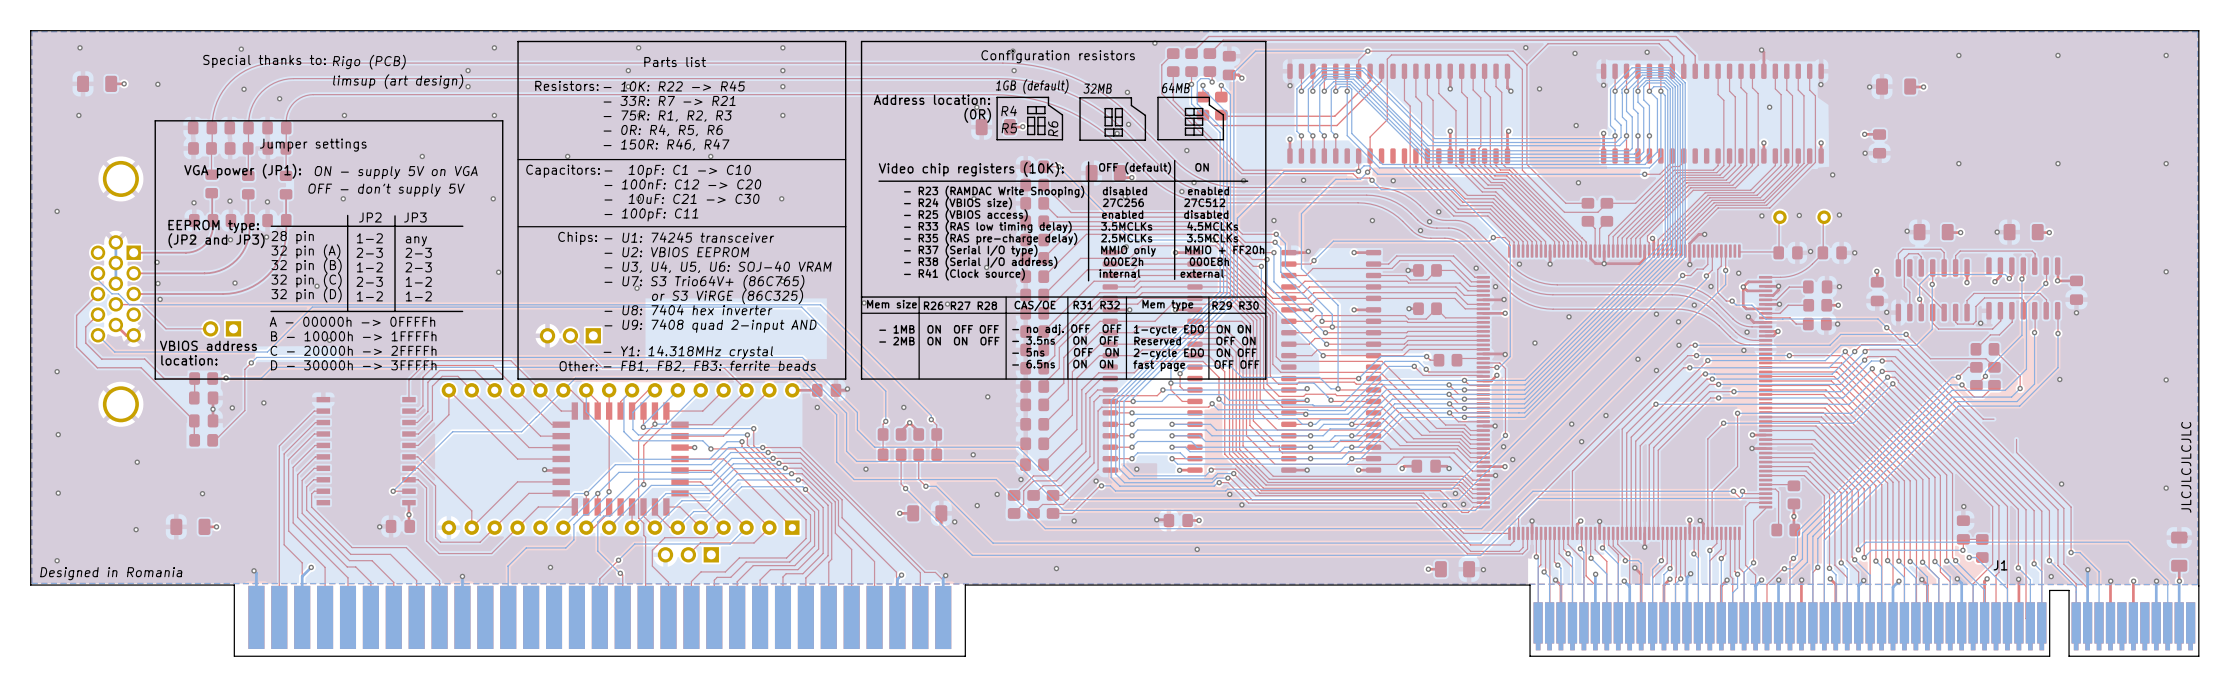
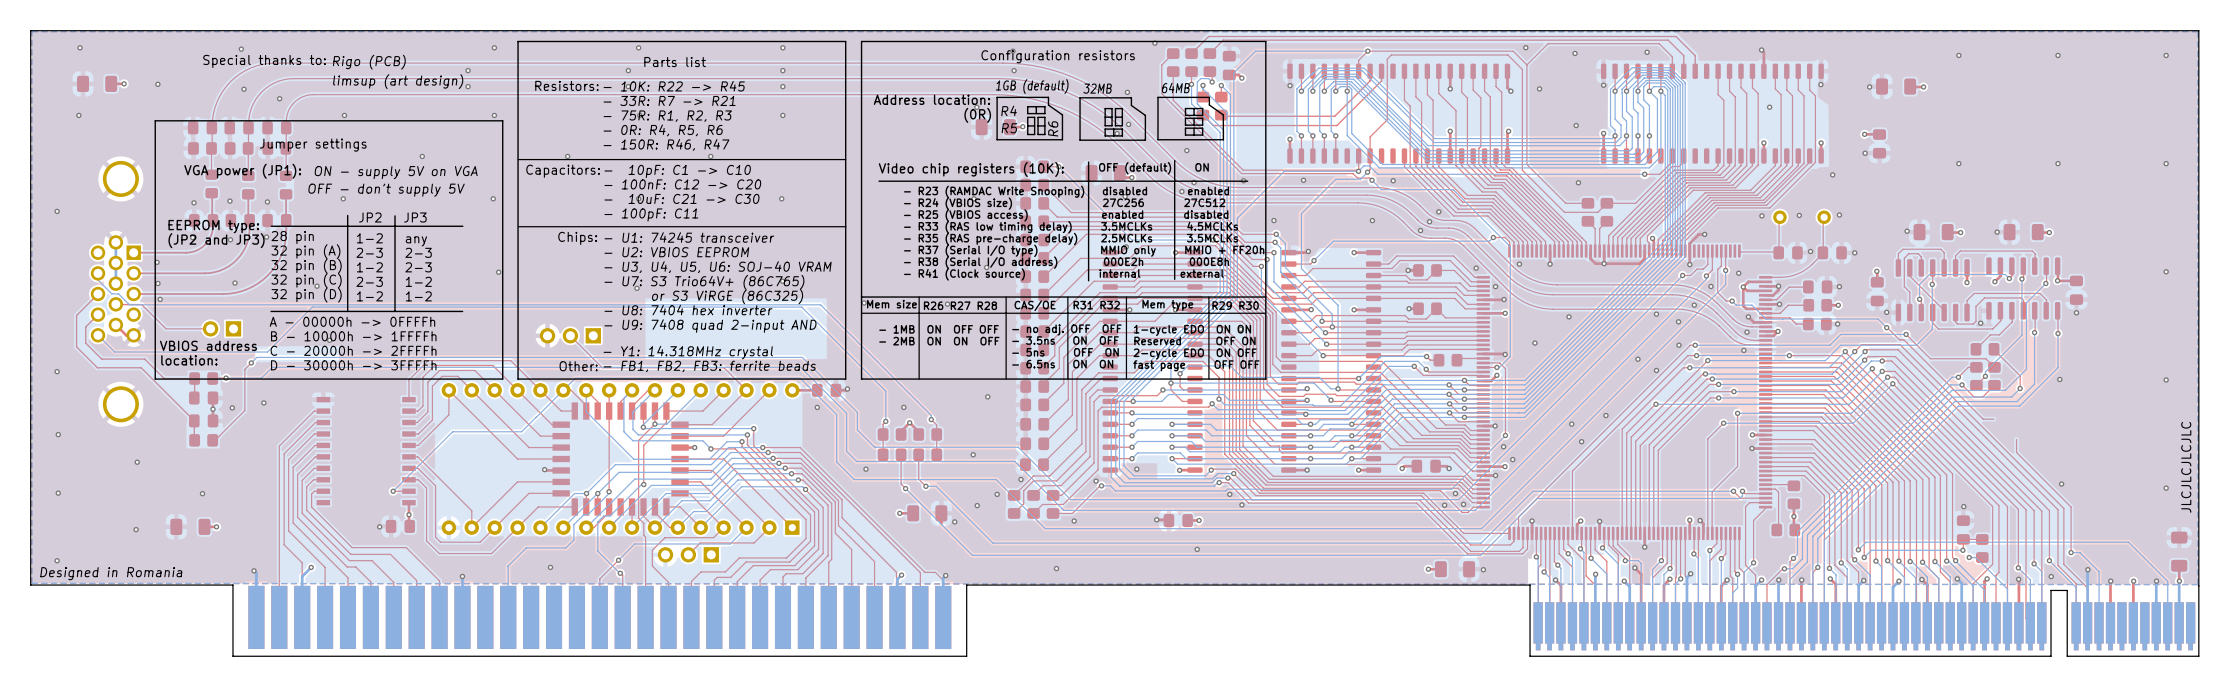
J1: (1114, 343) -> none
part: none -> (1114, 343)

